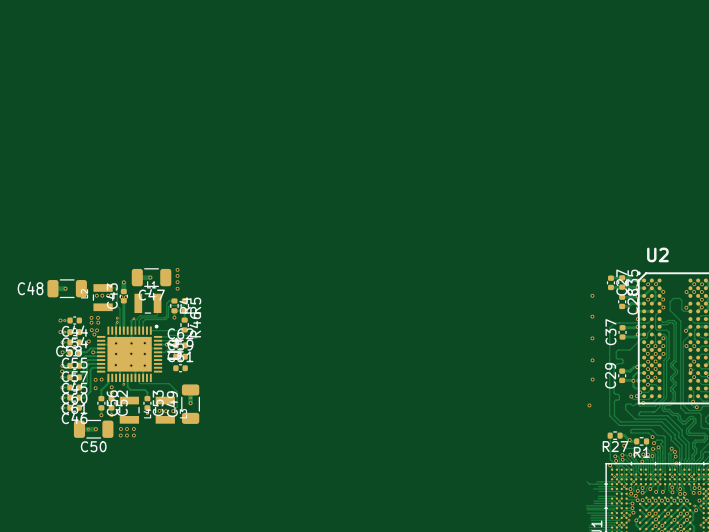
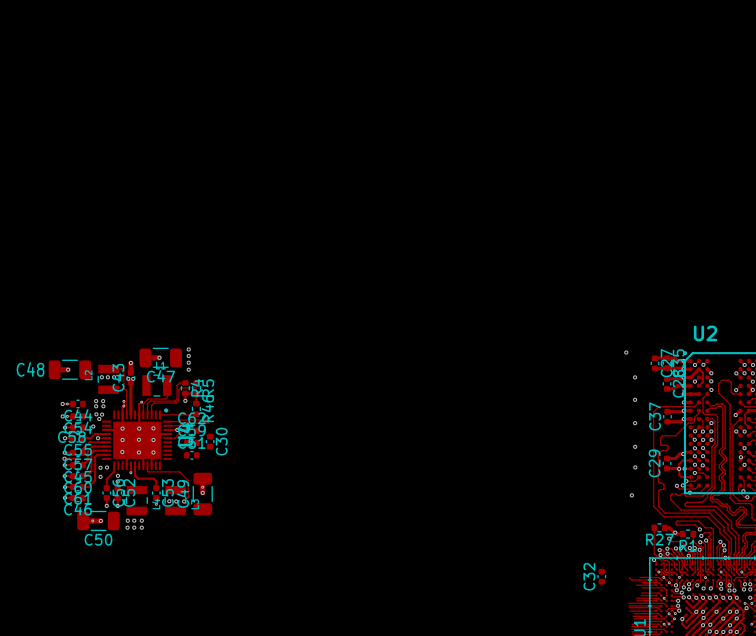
via: none -> (626, 352)
C30: none -> (210, 441)
C32: none -> (601, 576)

